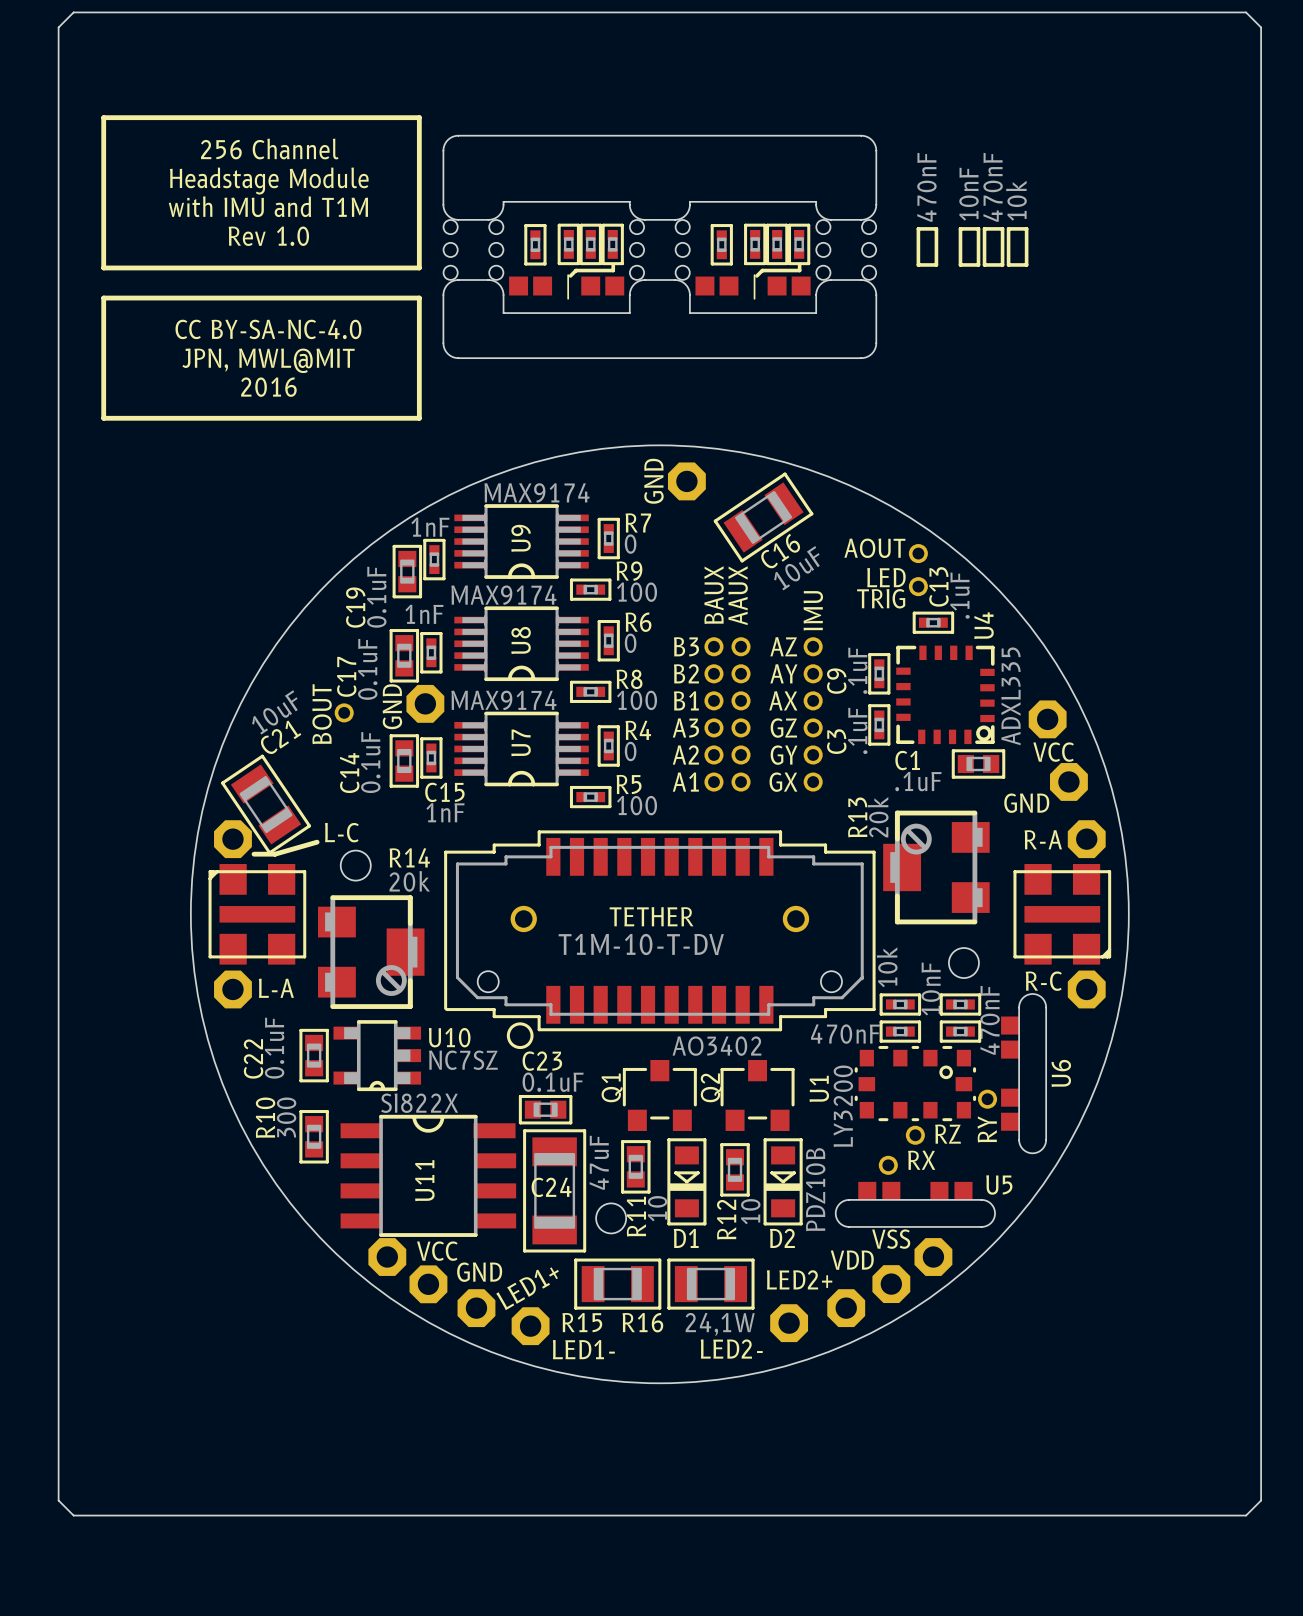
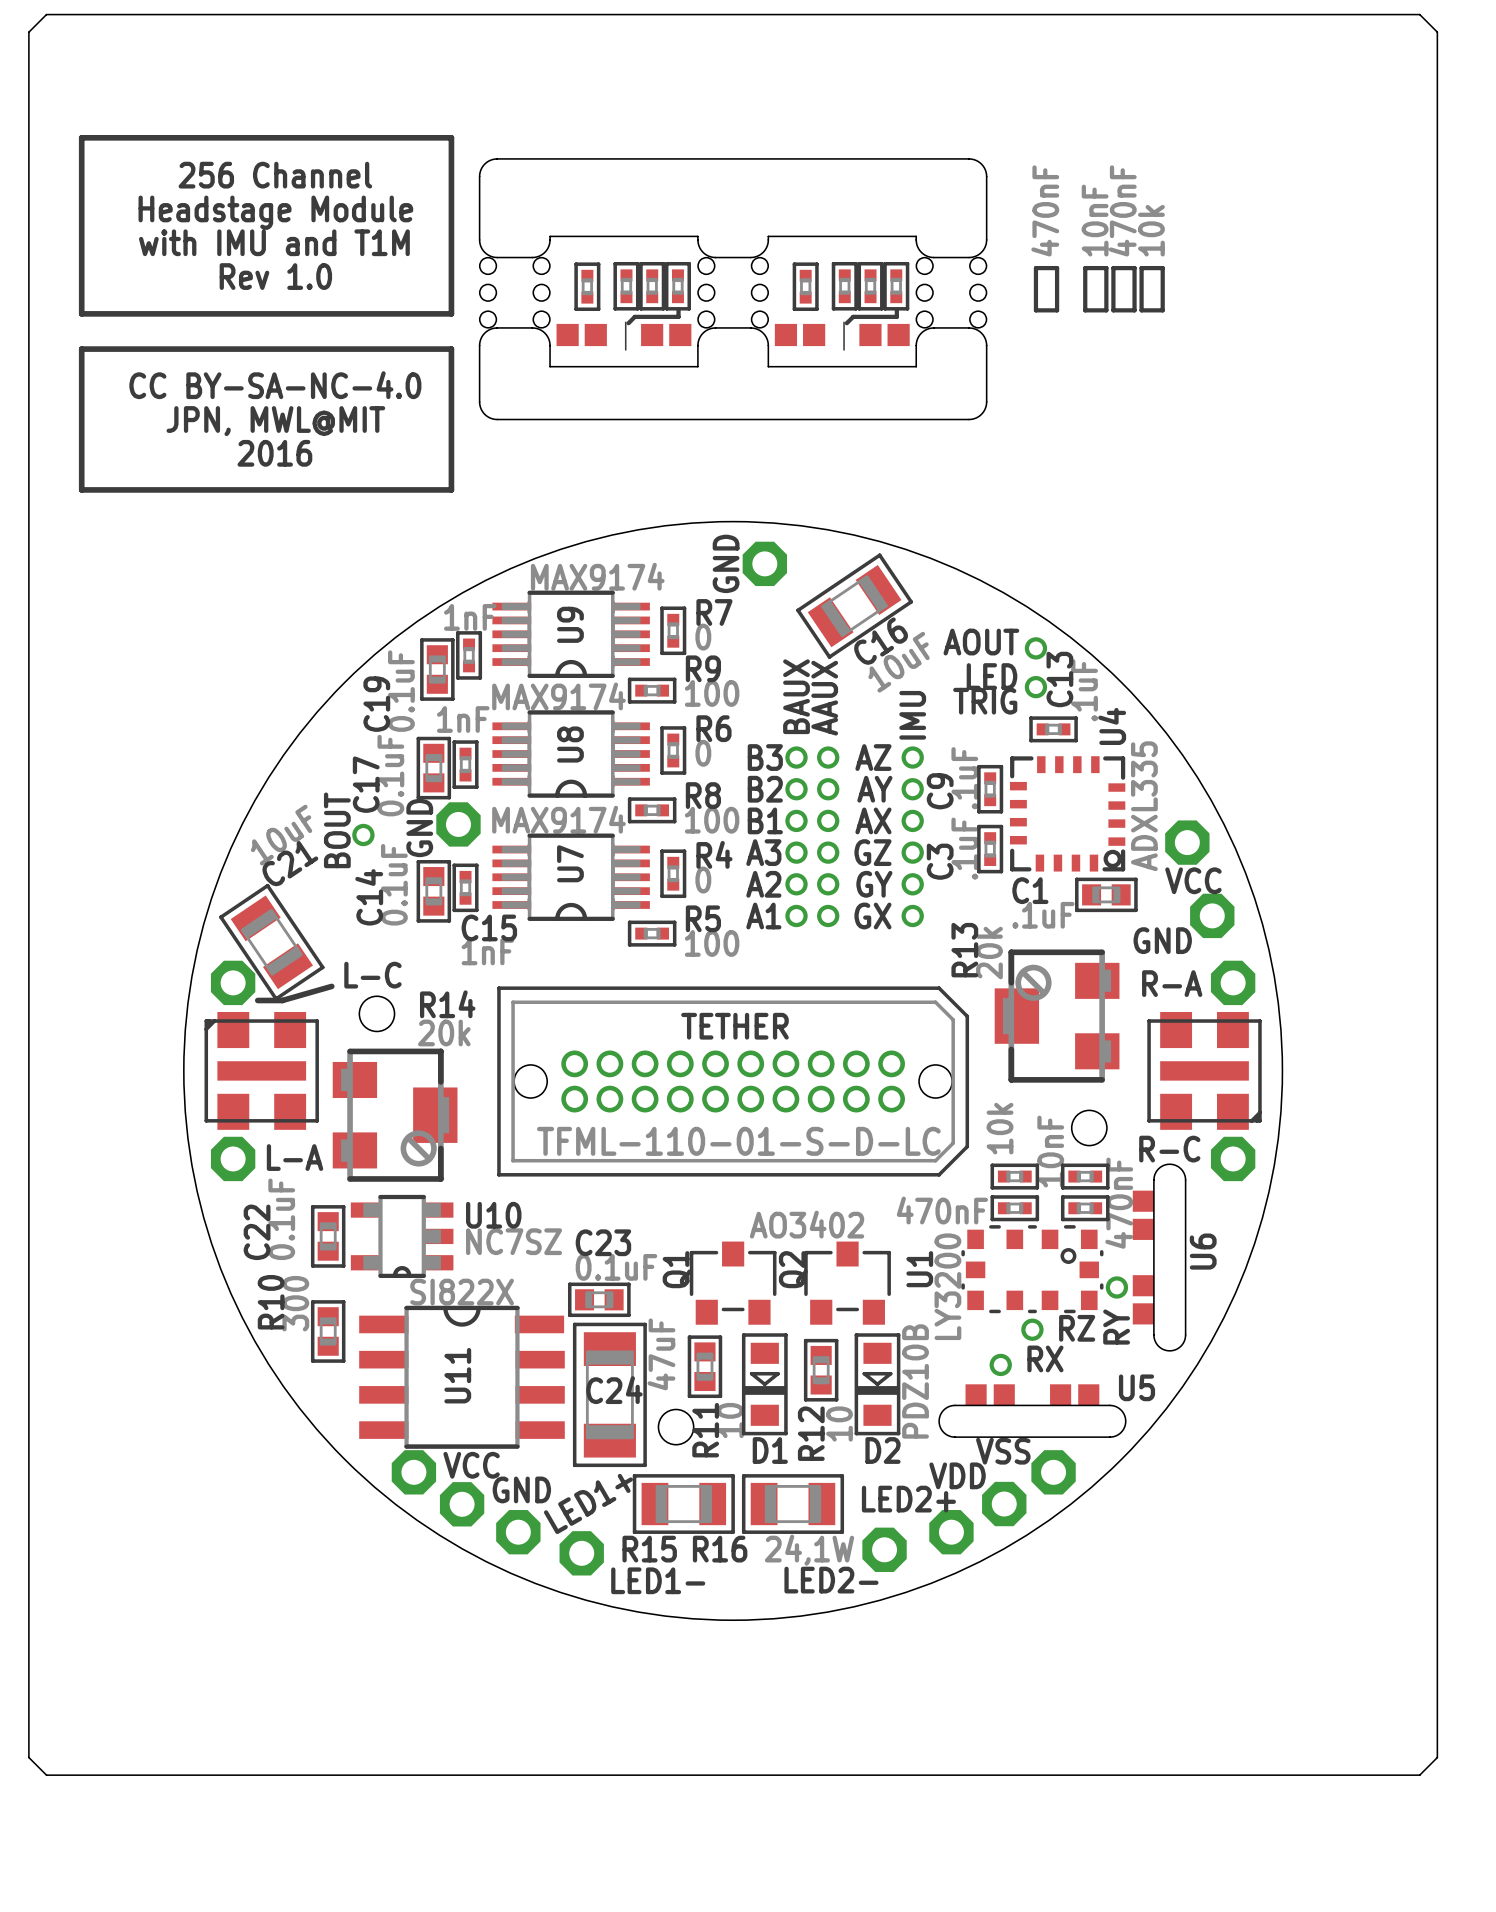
TETHER footprint: [444, 830, 876, 1050] -> [497, 986, 970, 1177]
TETHER value: T1M-10-T-DV (641, 944) -> TFML-110-01-S-D-LC (738, 1141)

